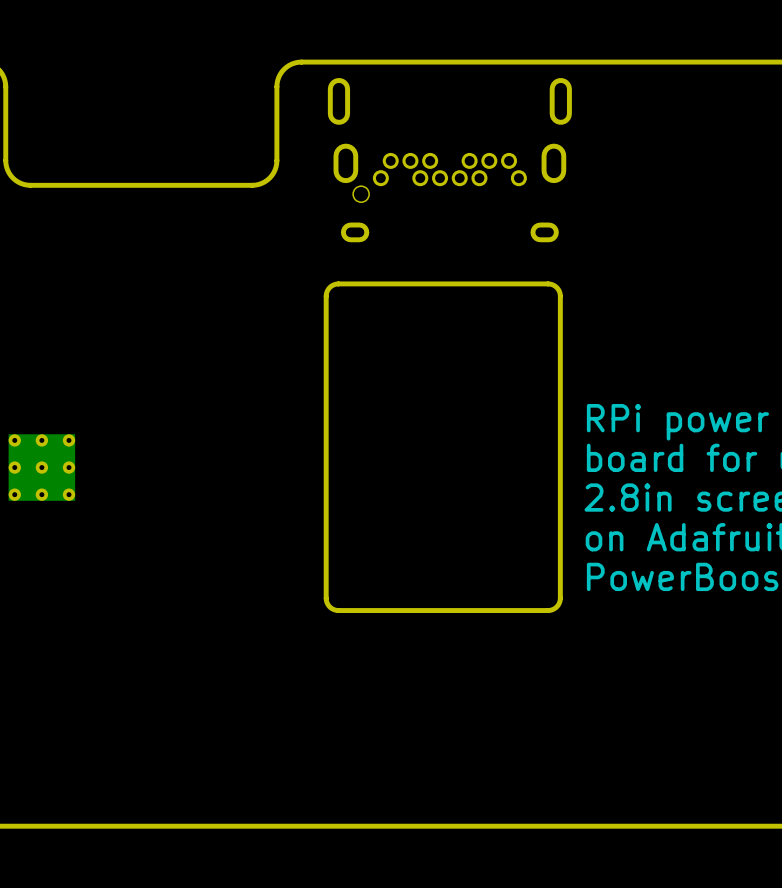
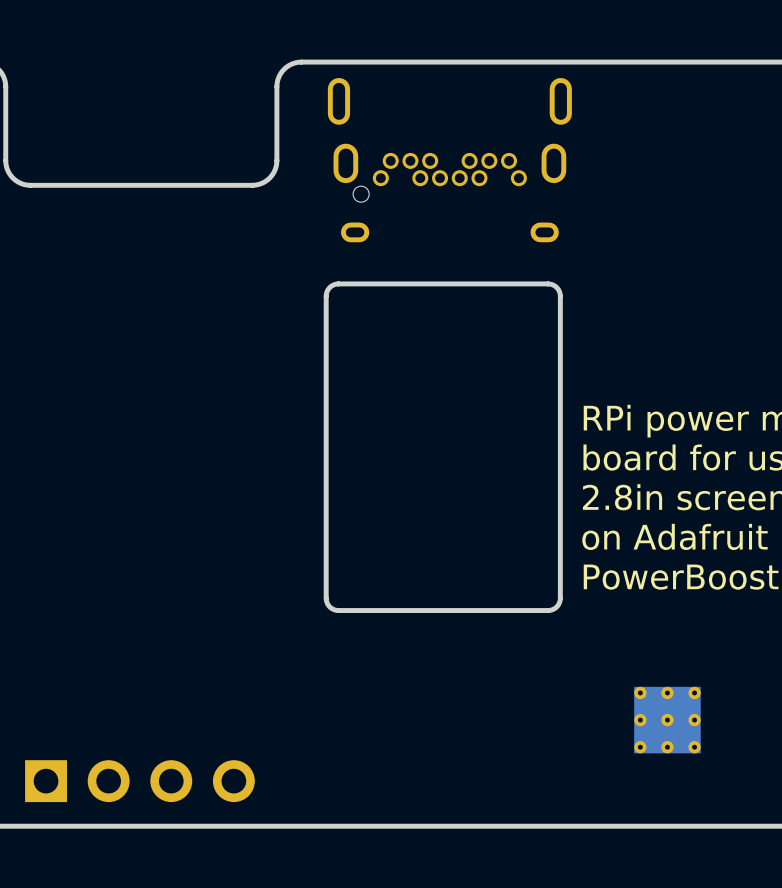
part: (41, 467) -> none
part: none -> (667, 720)
part: none -> (139, 781)

